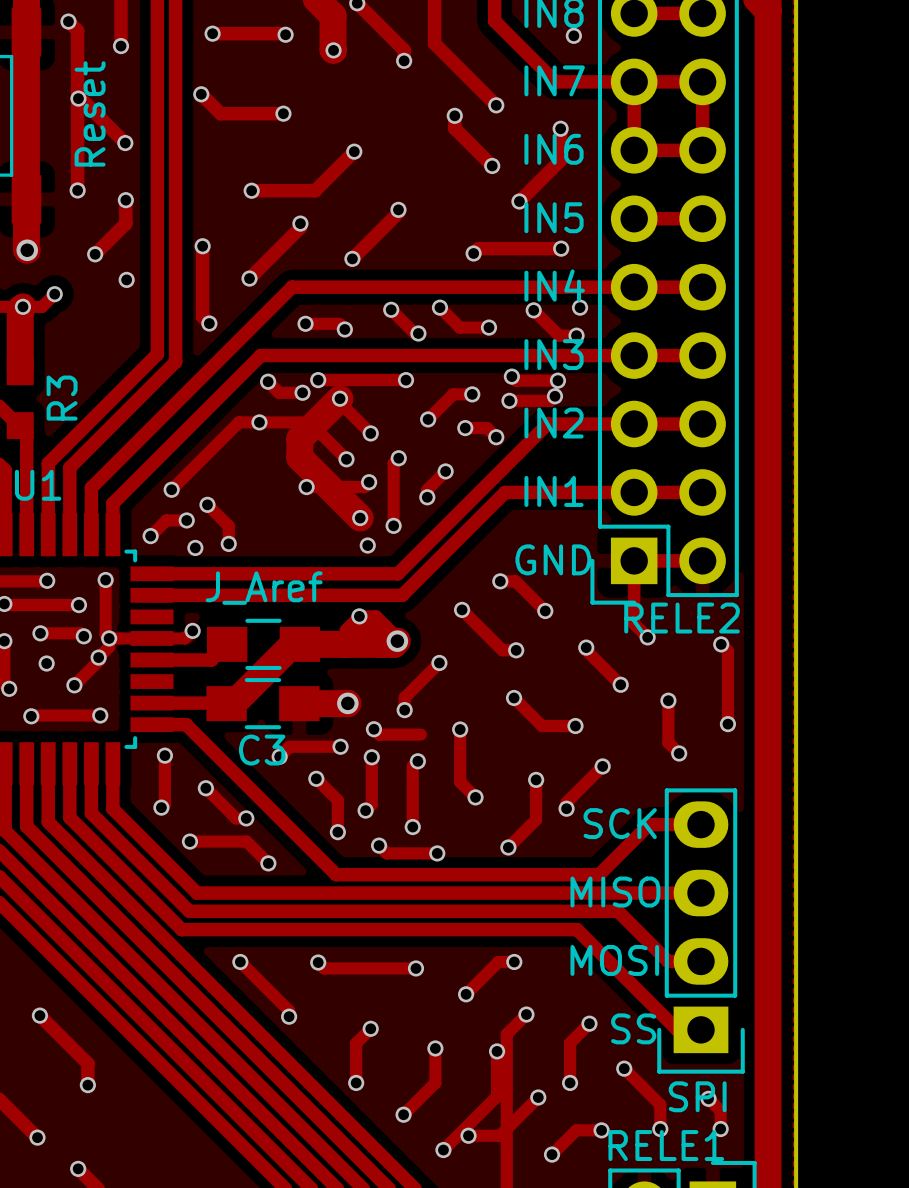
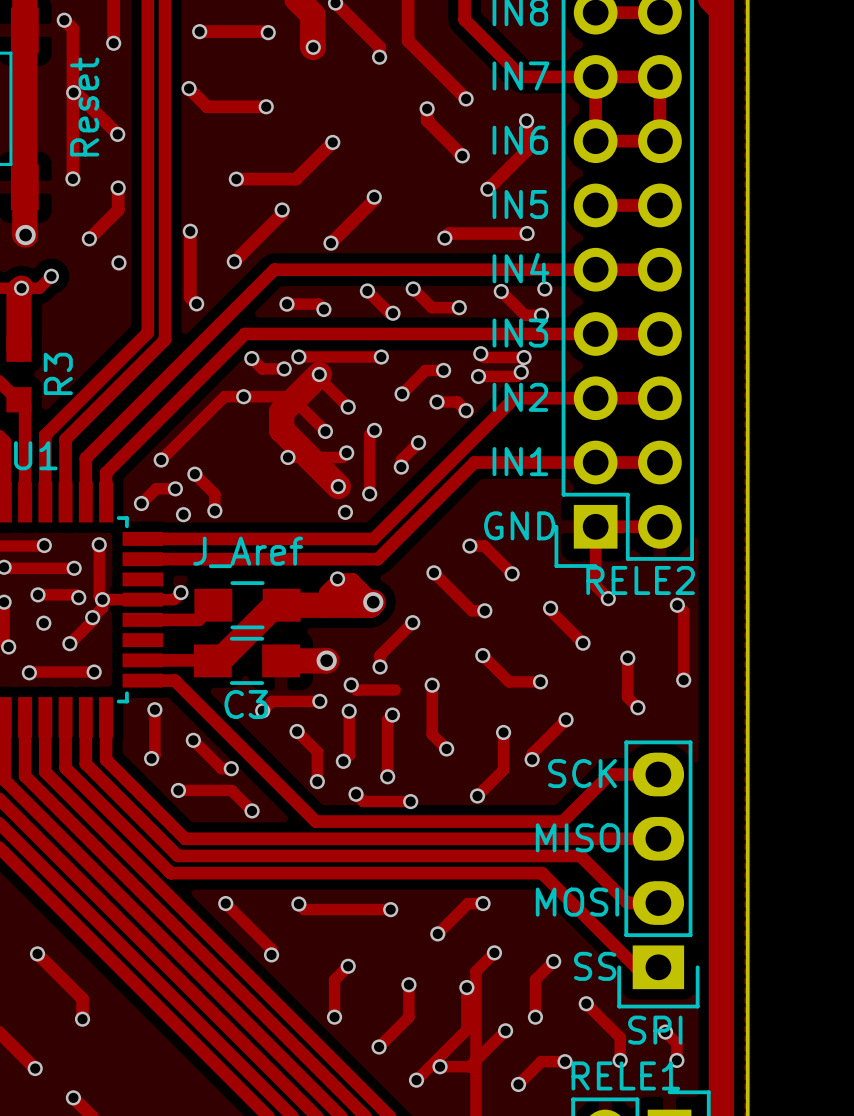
via: (573, 35) -> none

